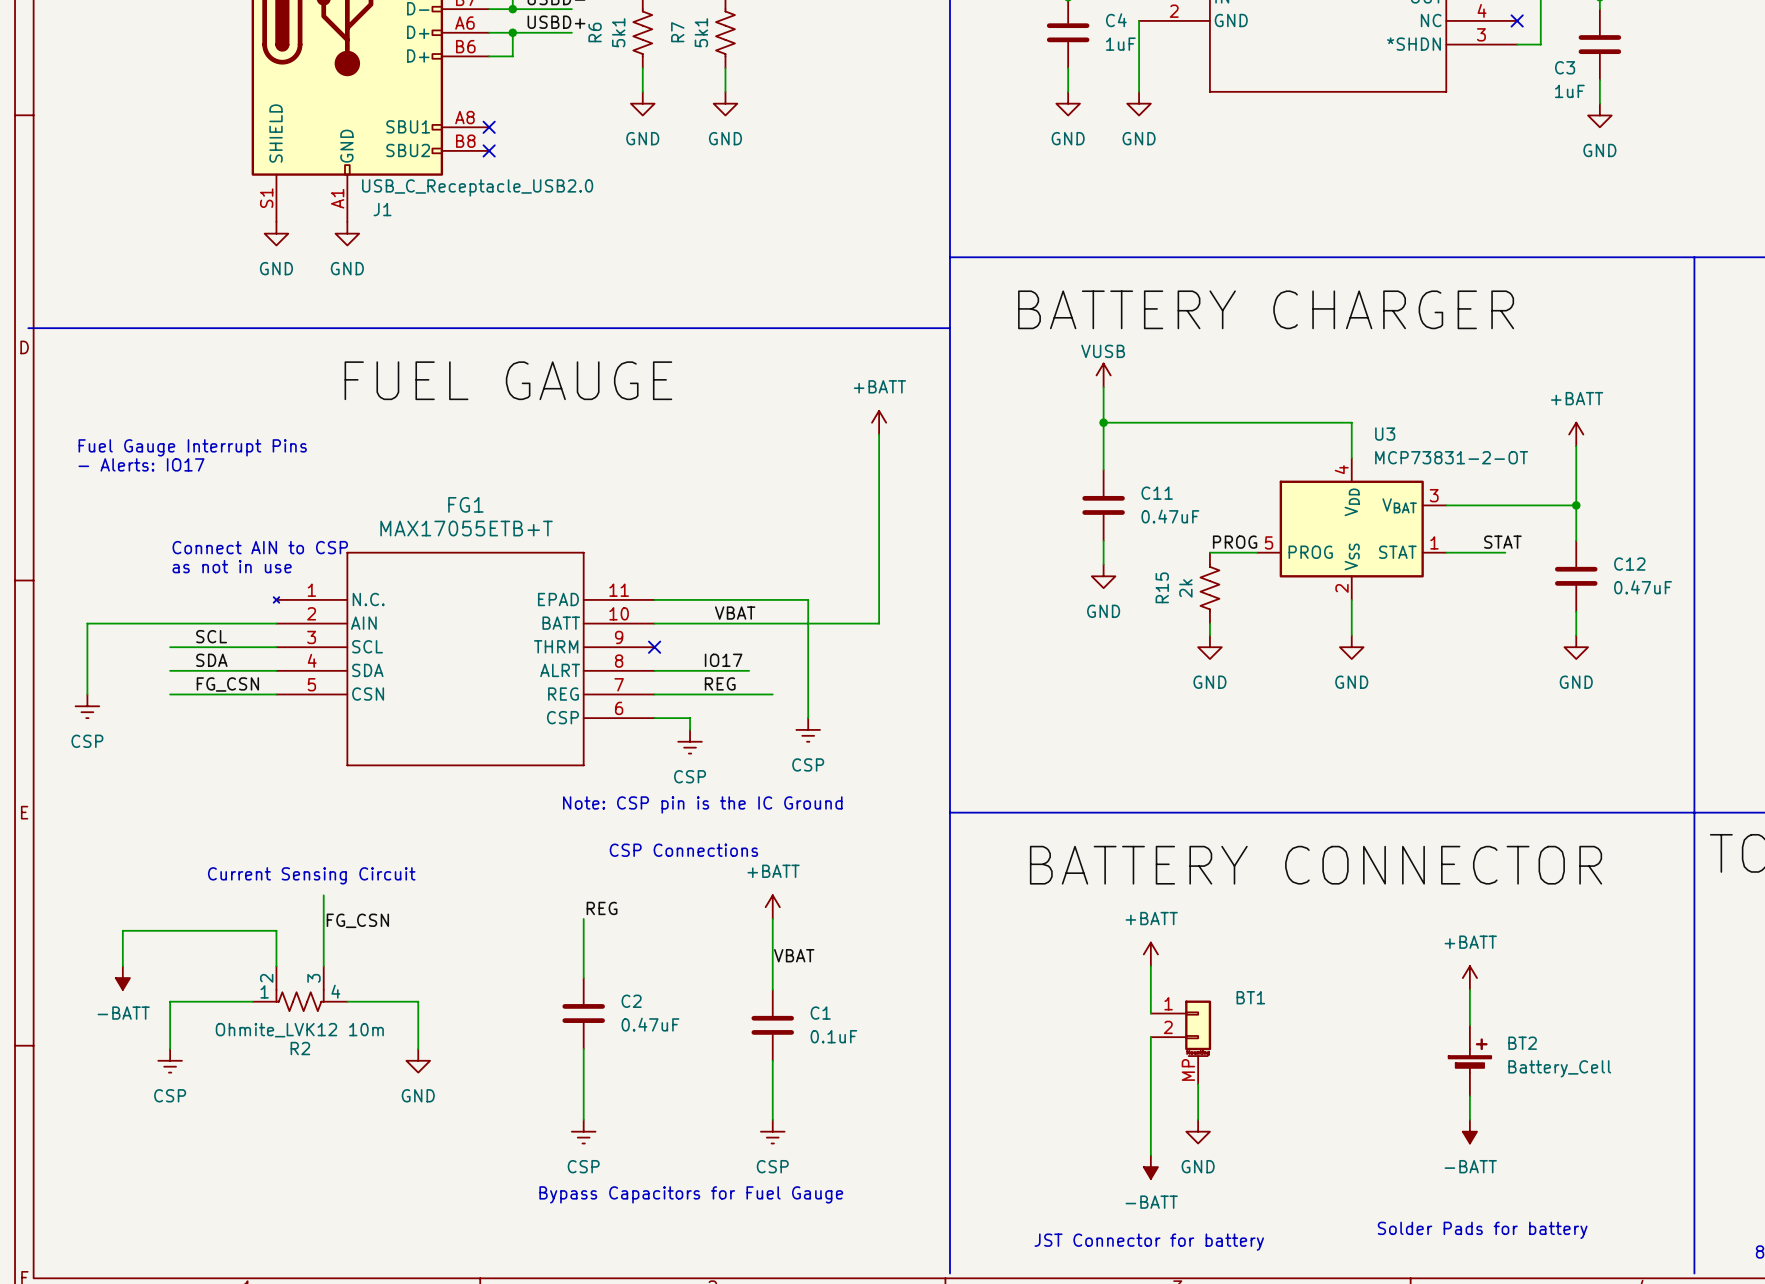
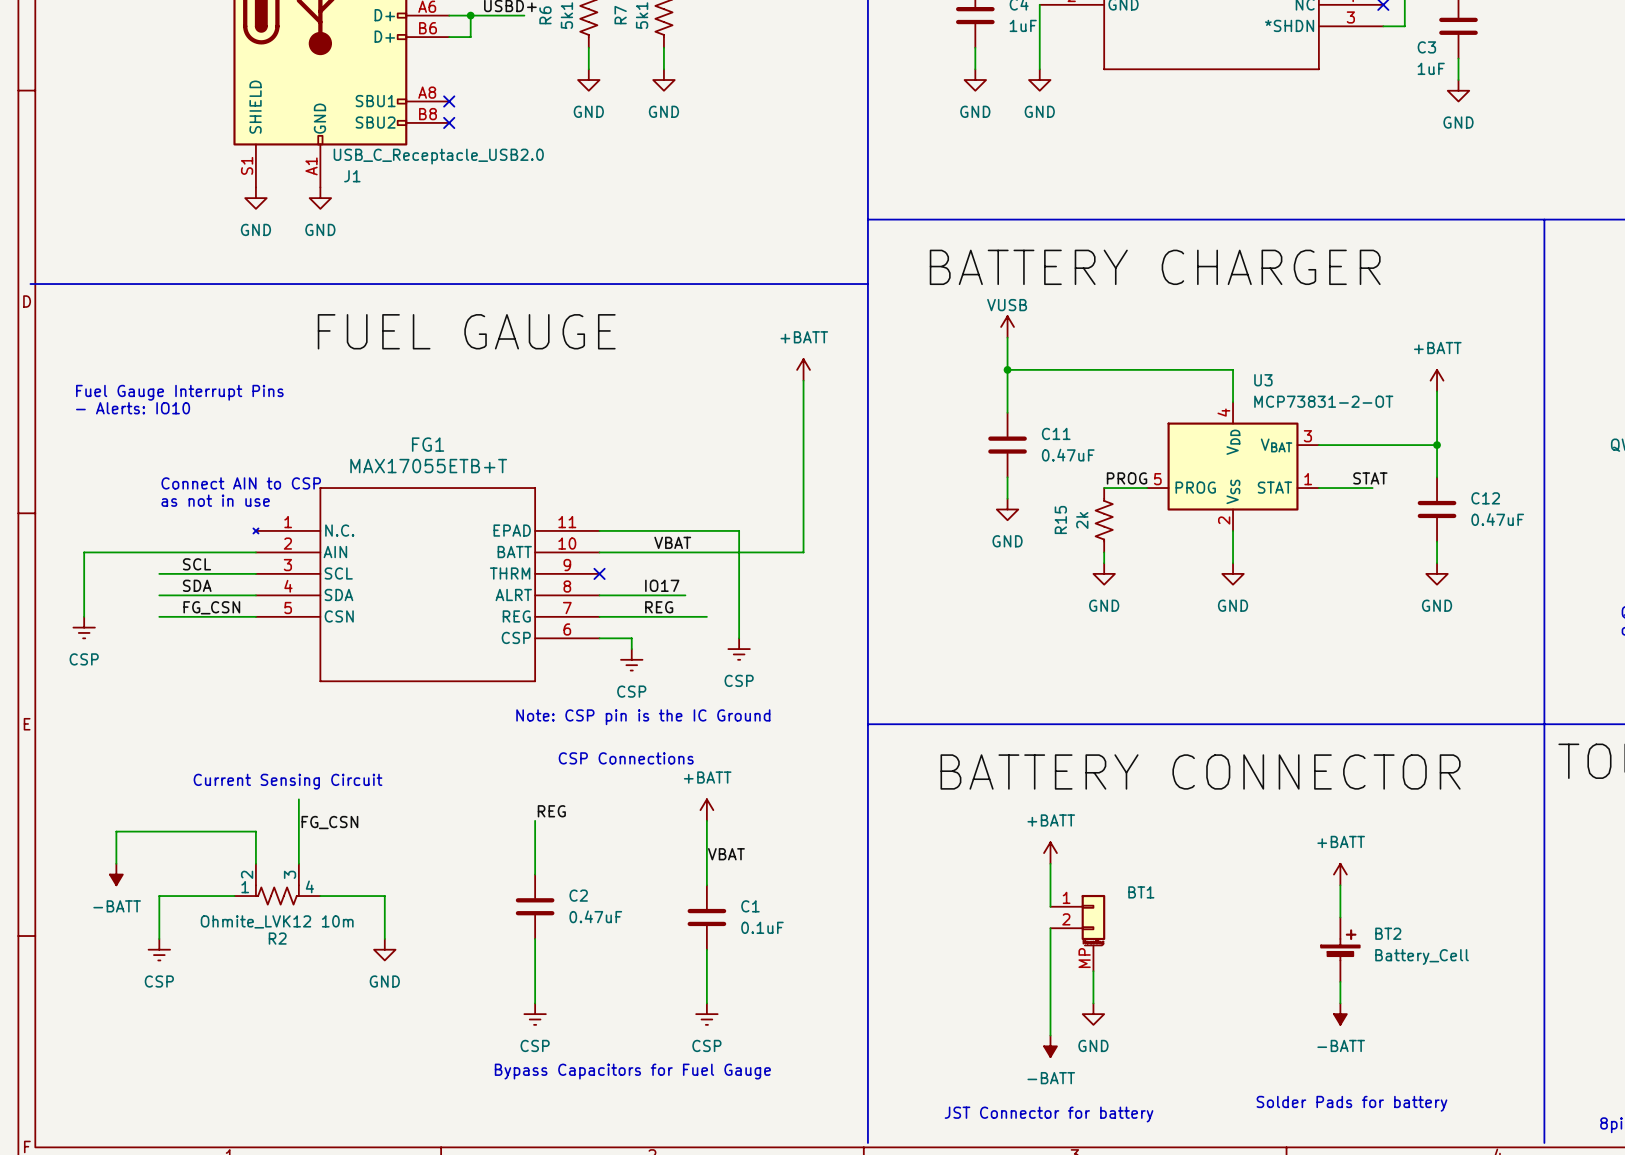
text: - Alerts: IO17 (141, 464) -> - Alerts: IO10 (133, 408)

